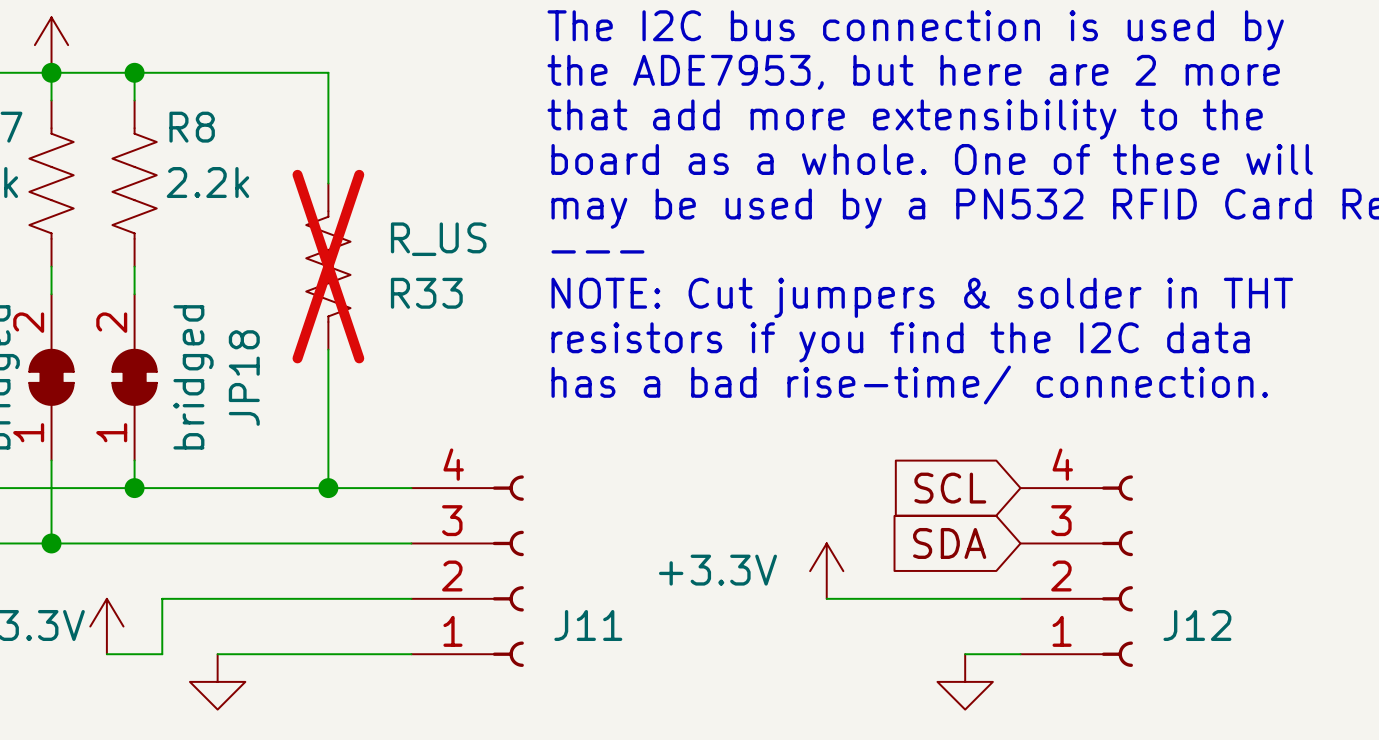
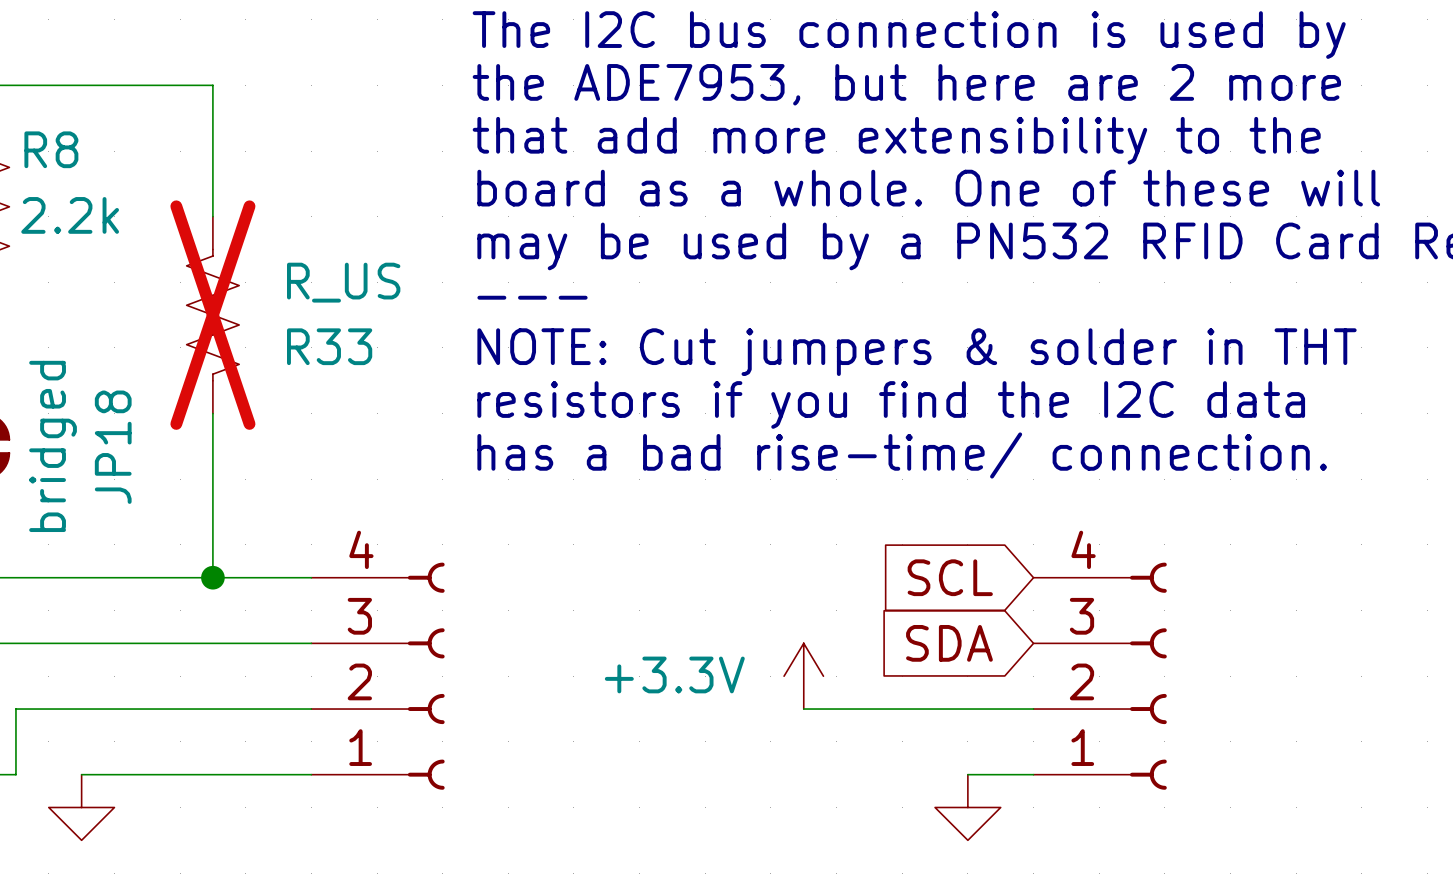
J11 name: J11 (588, 625) -> none
J12 name: J12 (1197, 625) -> none

